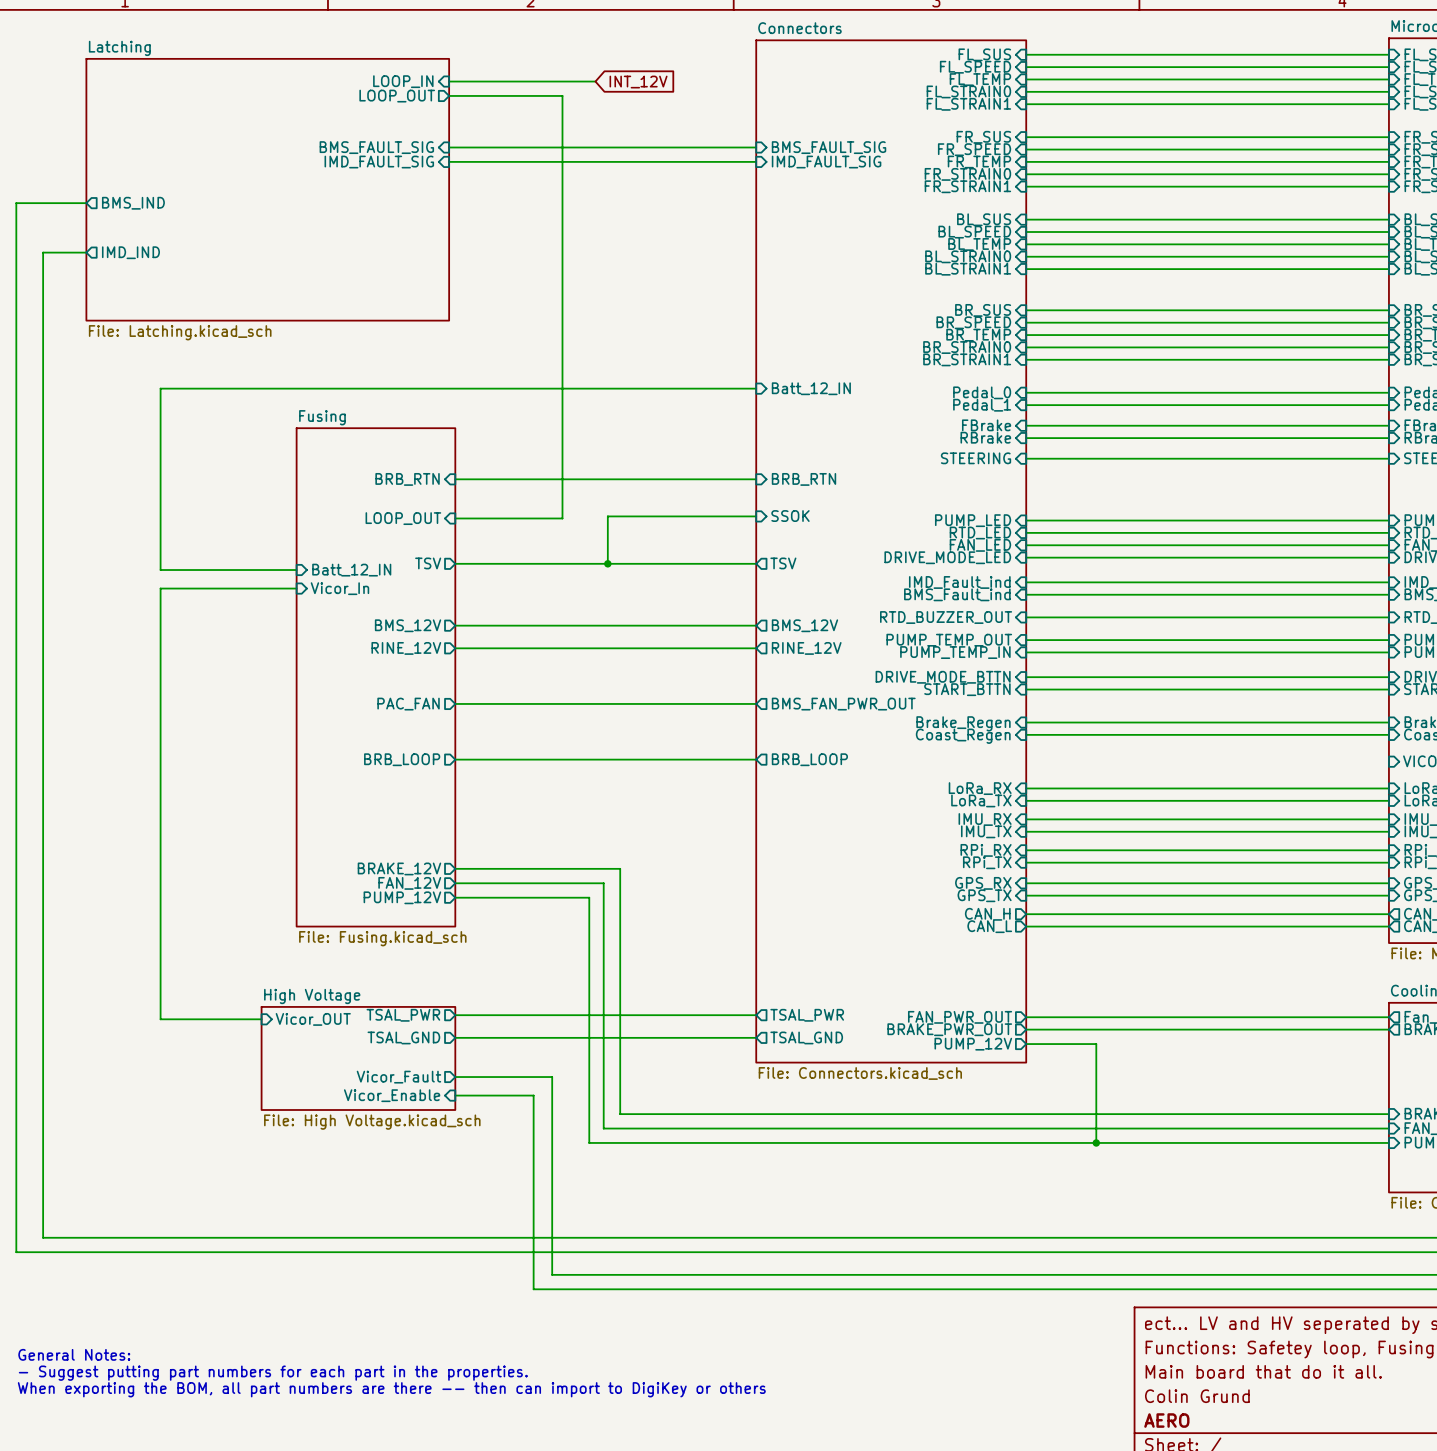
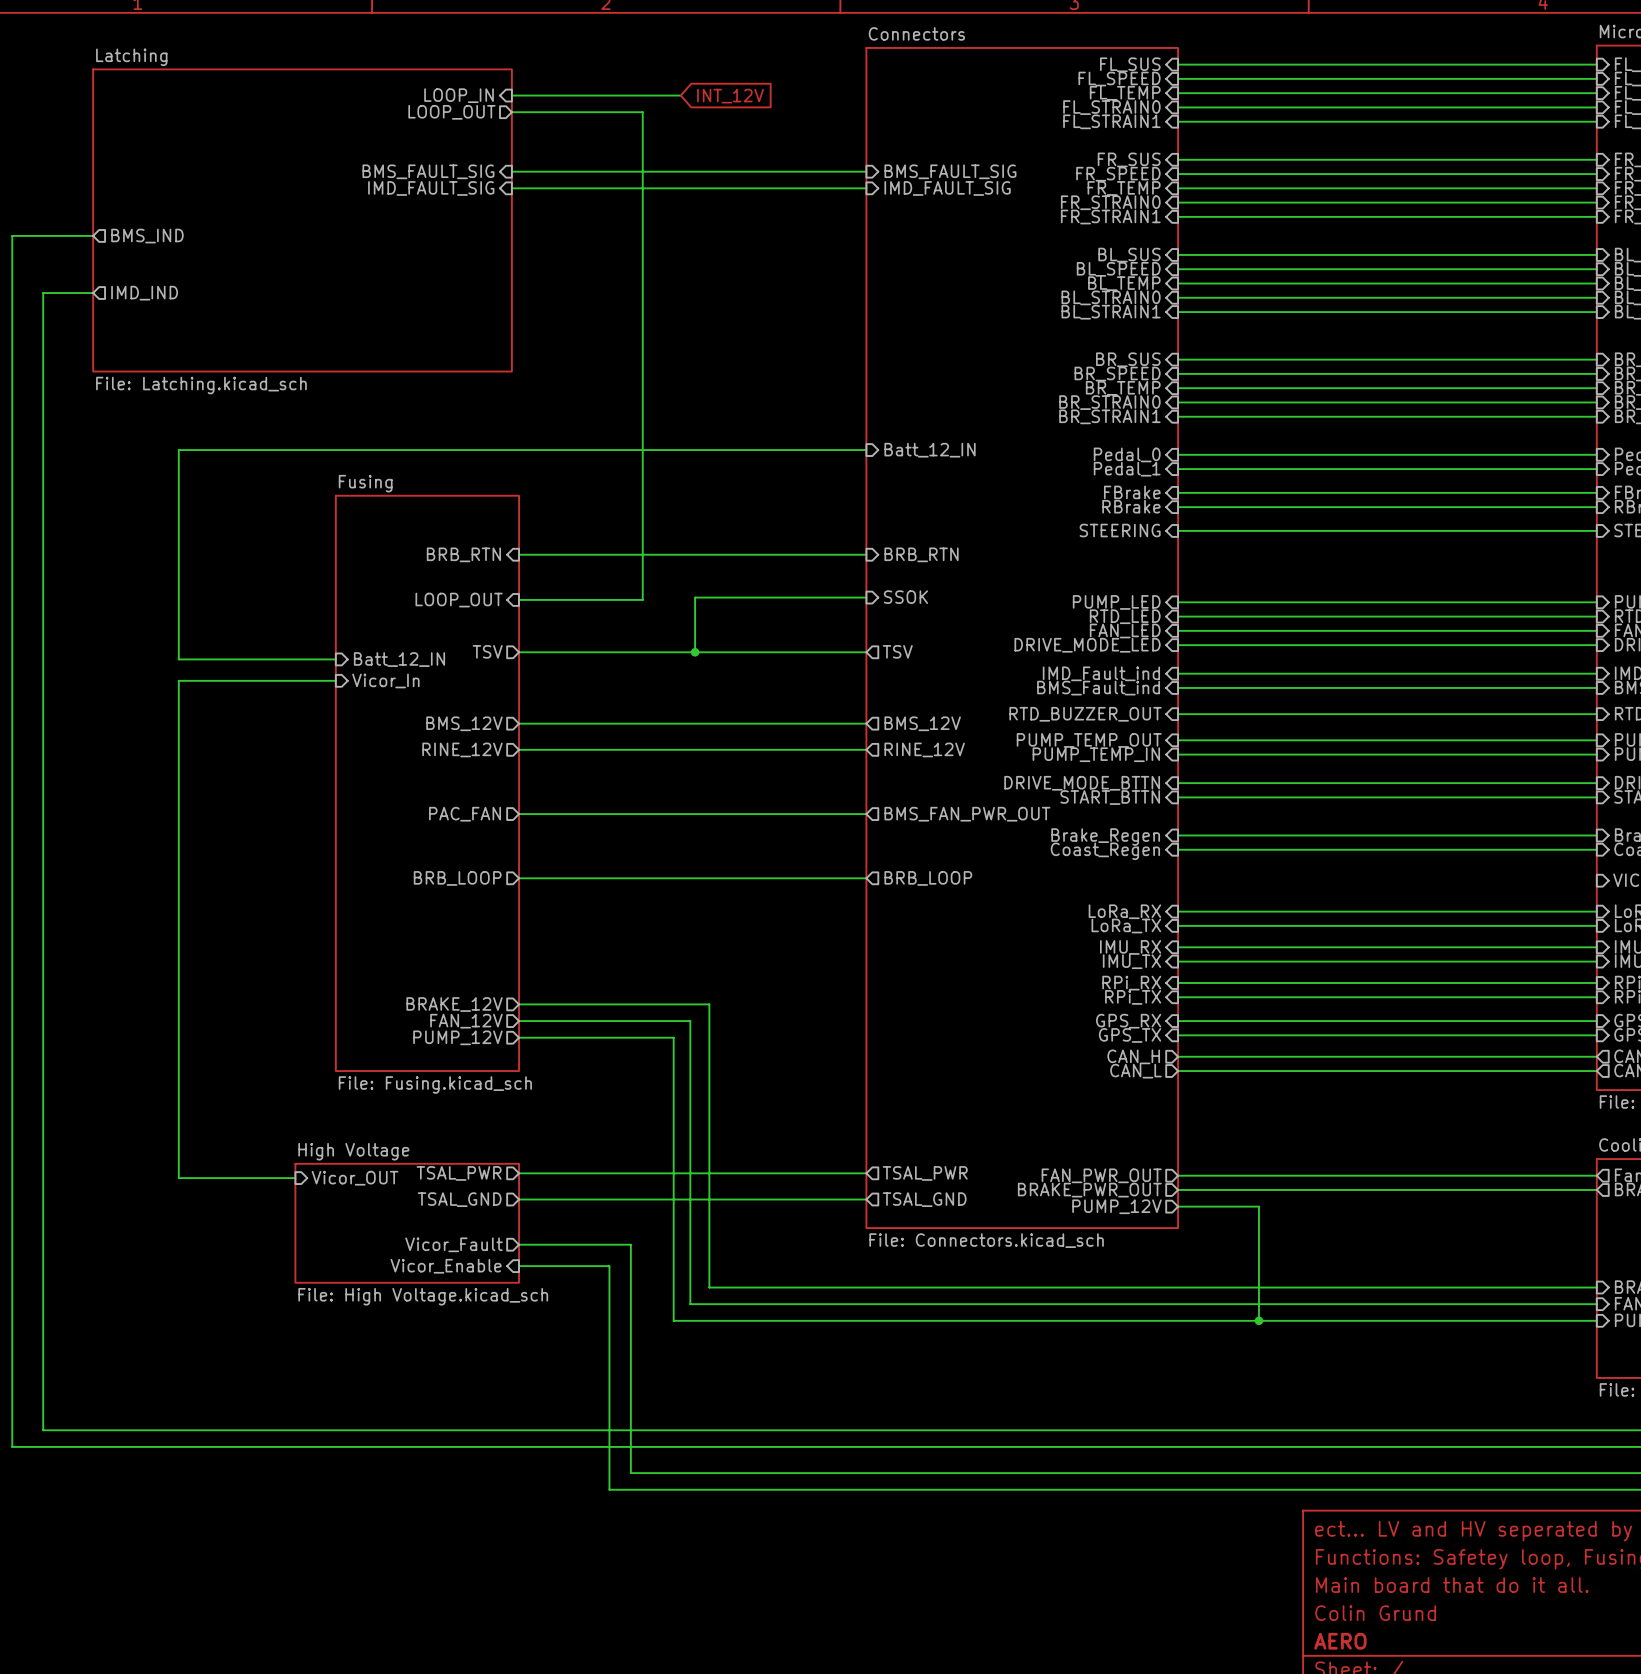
text: General Notes: (74, 1354) -> none
text: - Suggest putting part numbers for each part in the properties. (273, 1373) -> none
text: When exporting the BOM, all part numbers are there -- then can import to DigiKey or others (391, 1389) -> none

